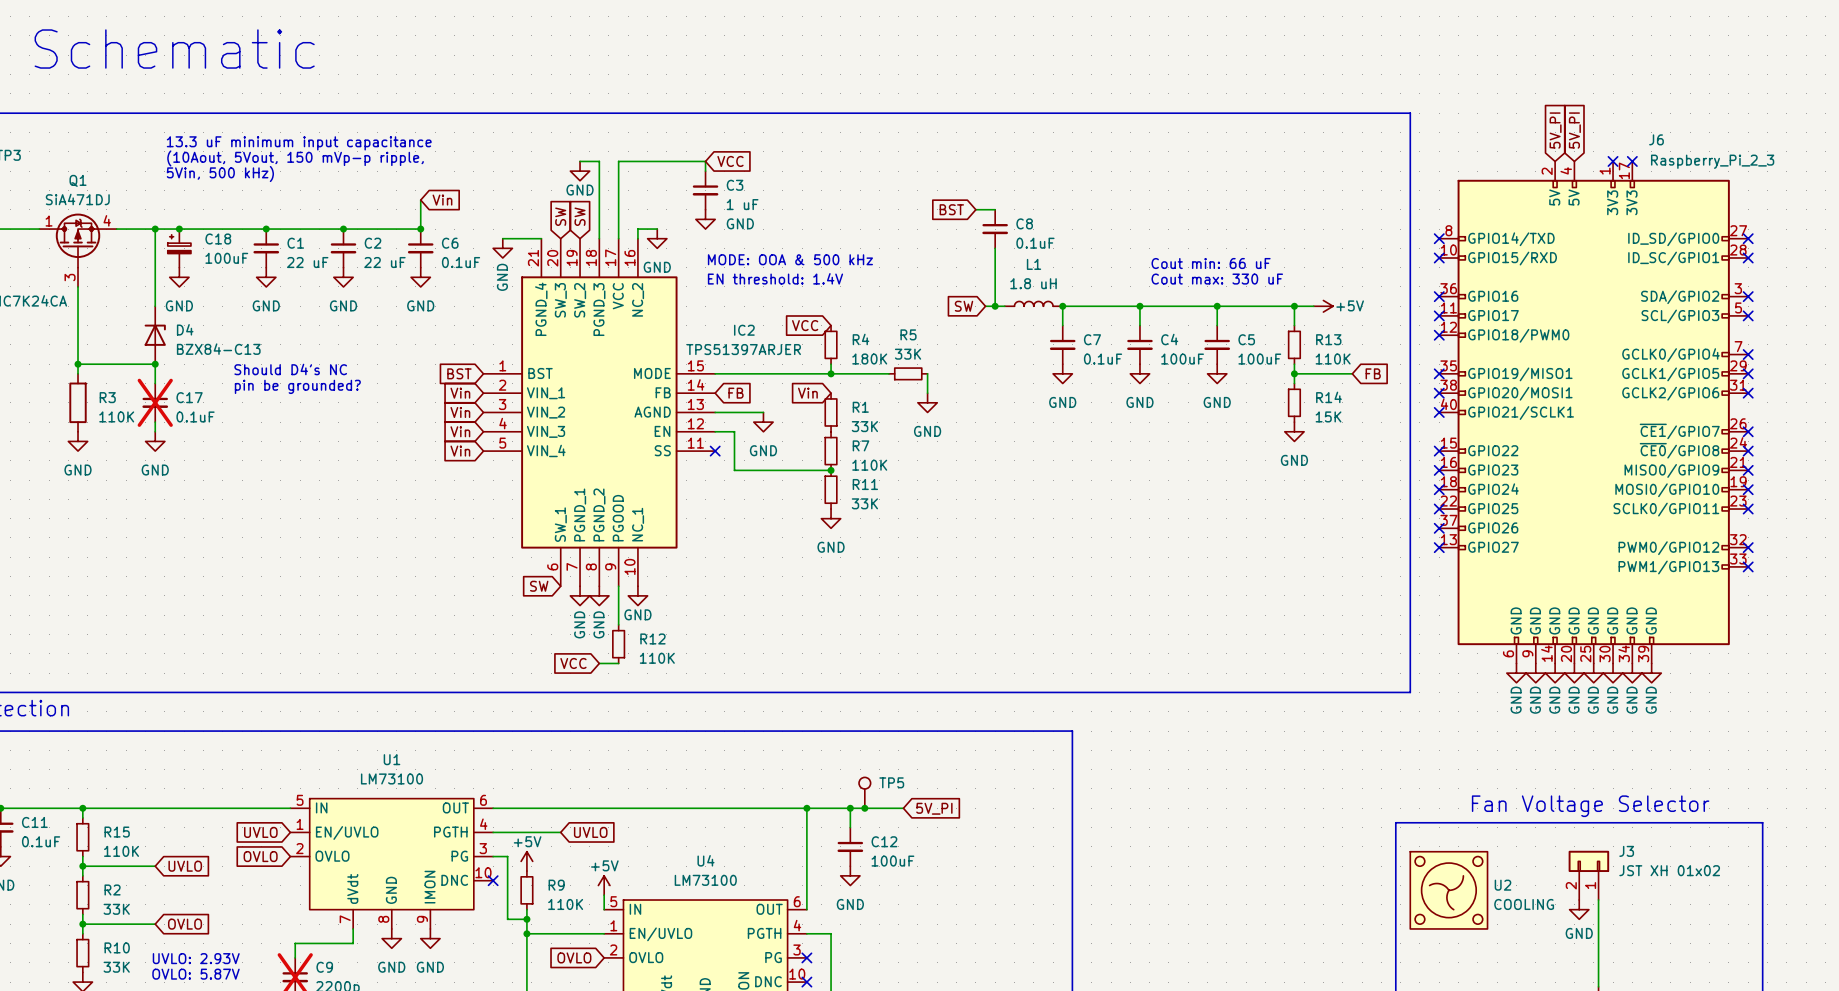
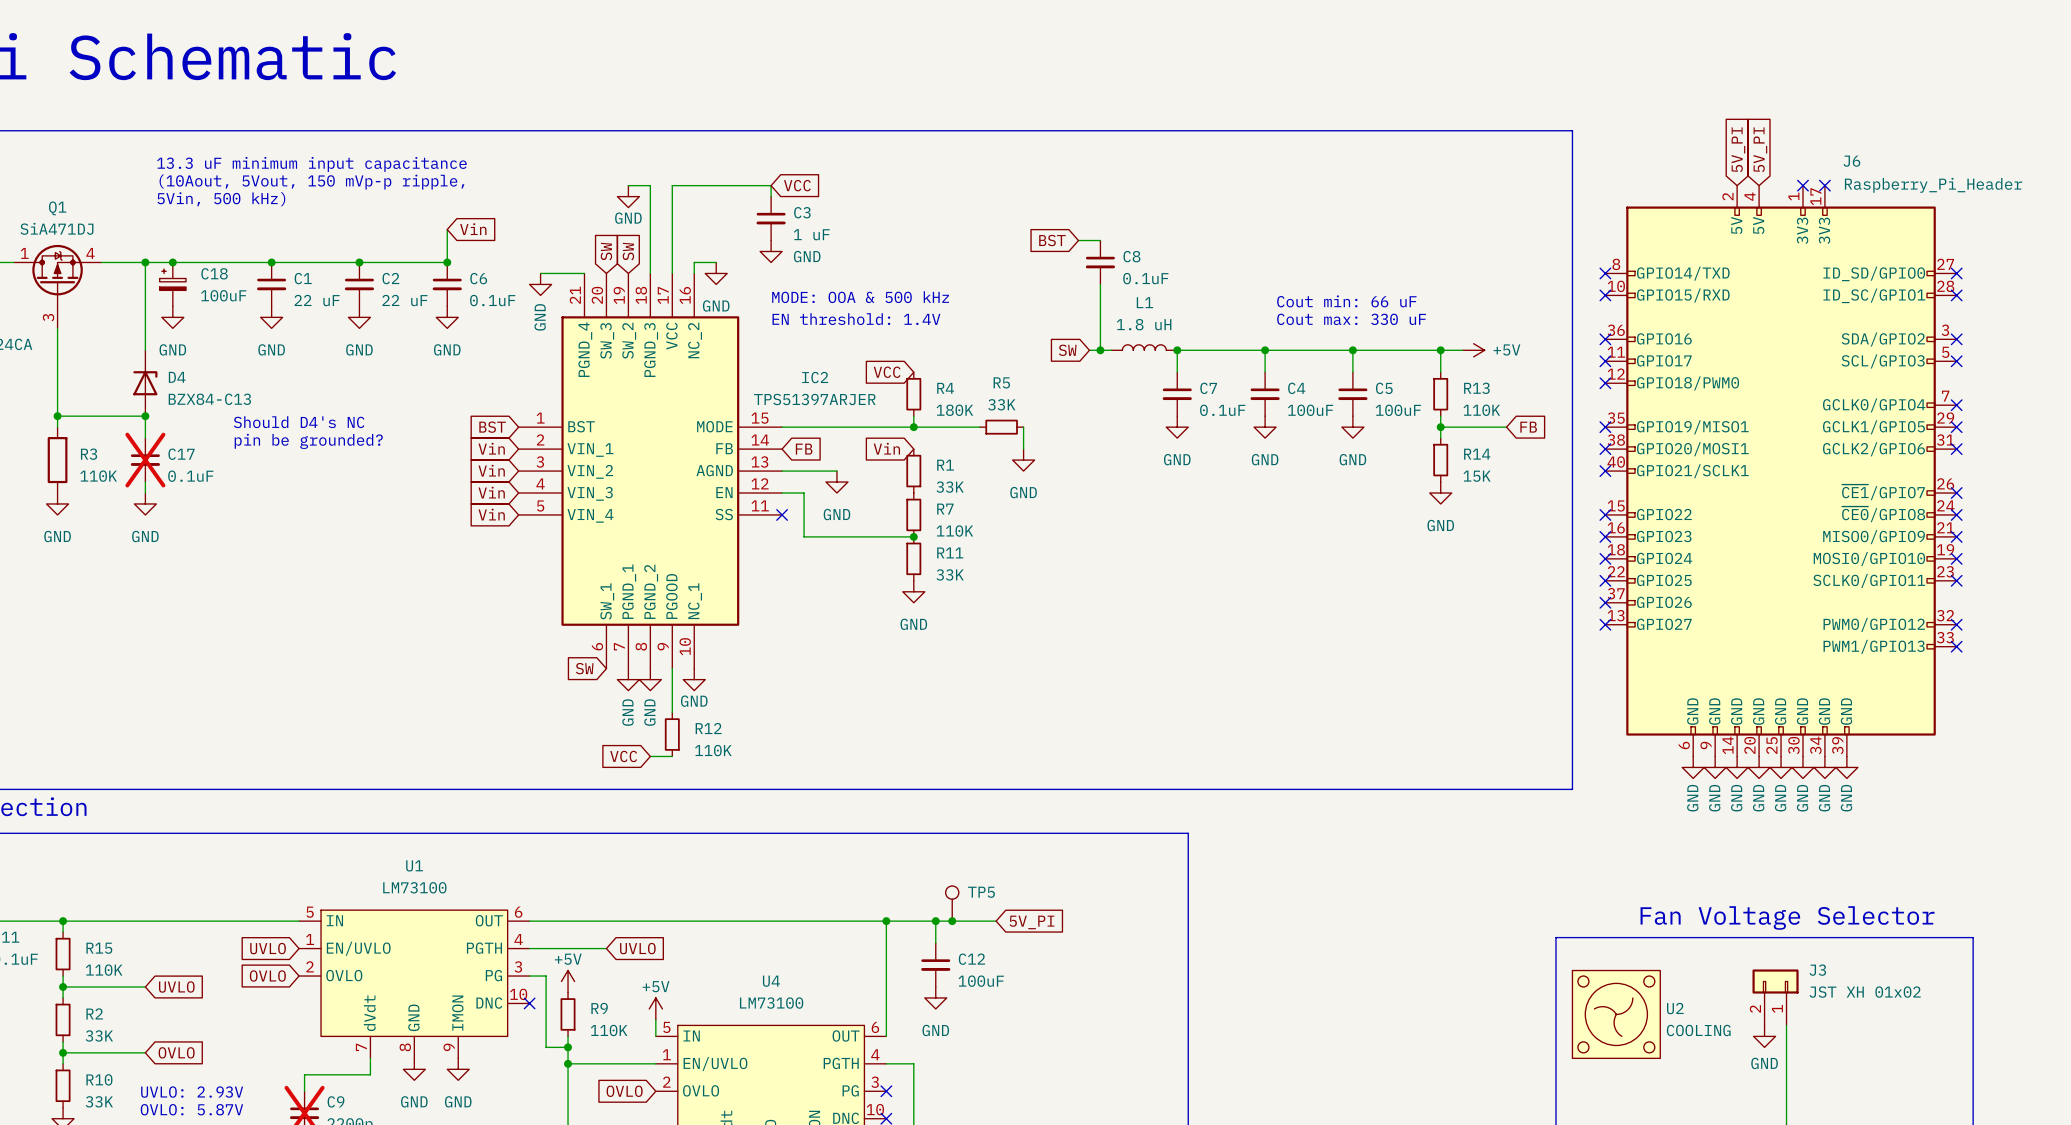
J6 value: Raspberry_Pi_2_3 (1712, 161) -> Raspberry_Pi_Header (1933, 185)

